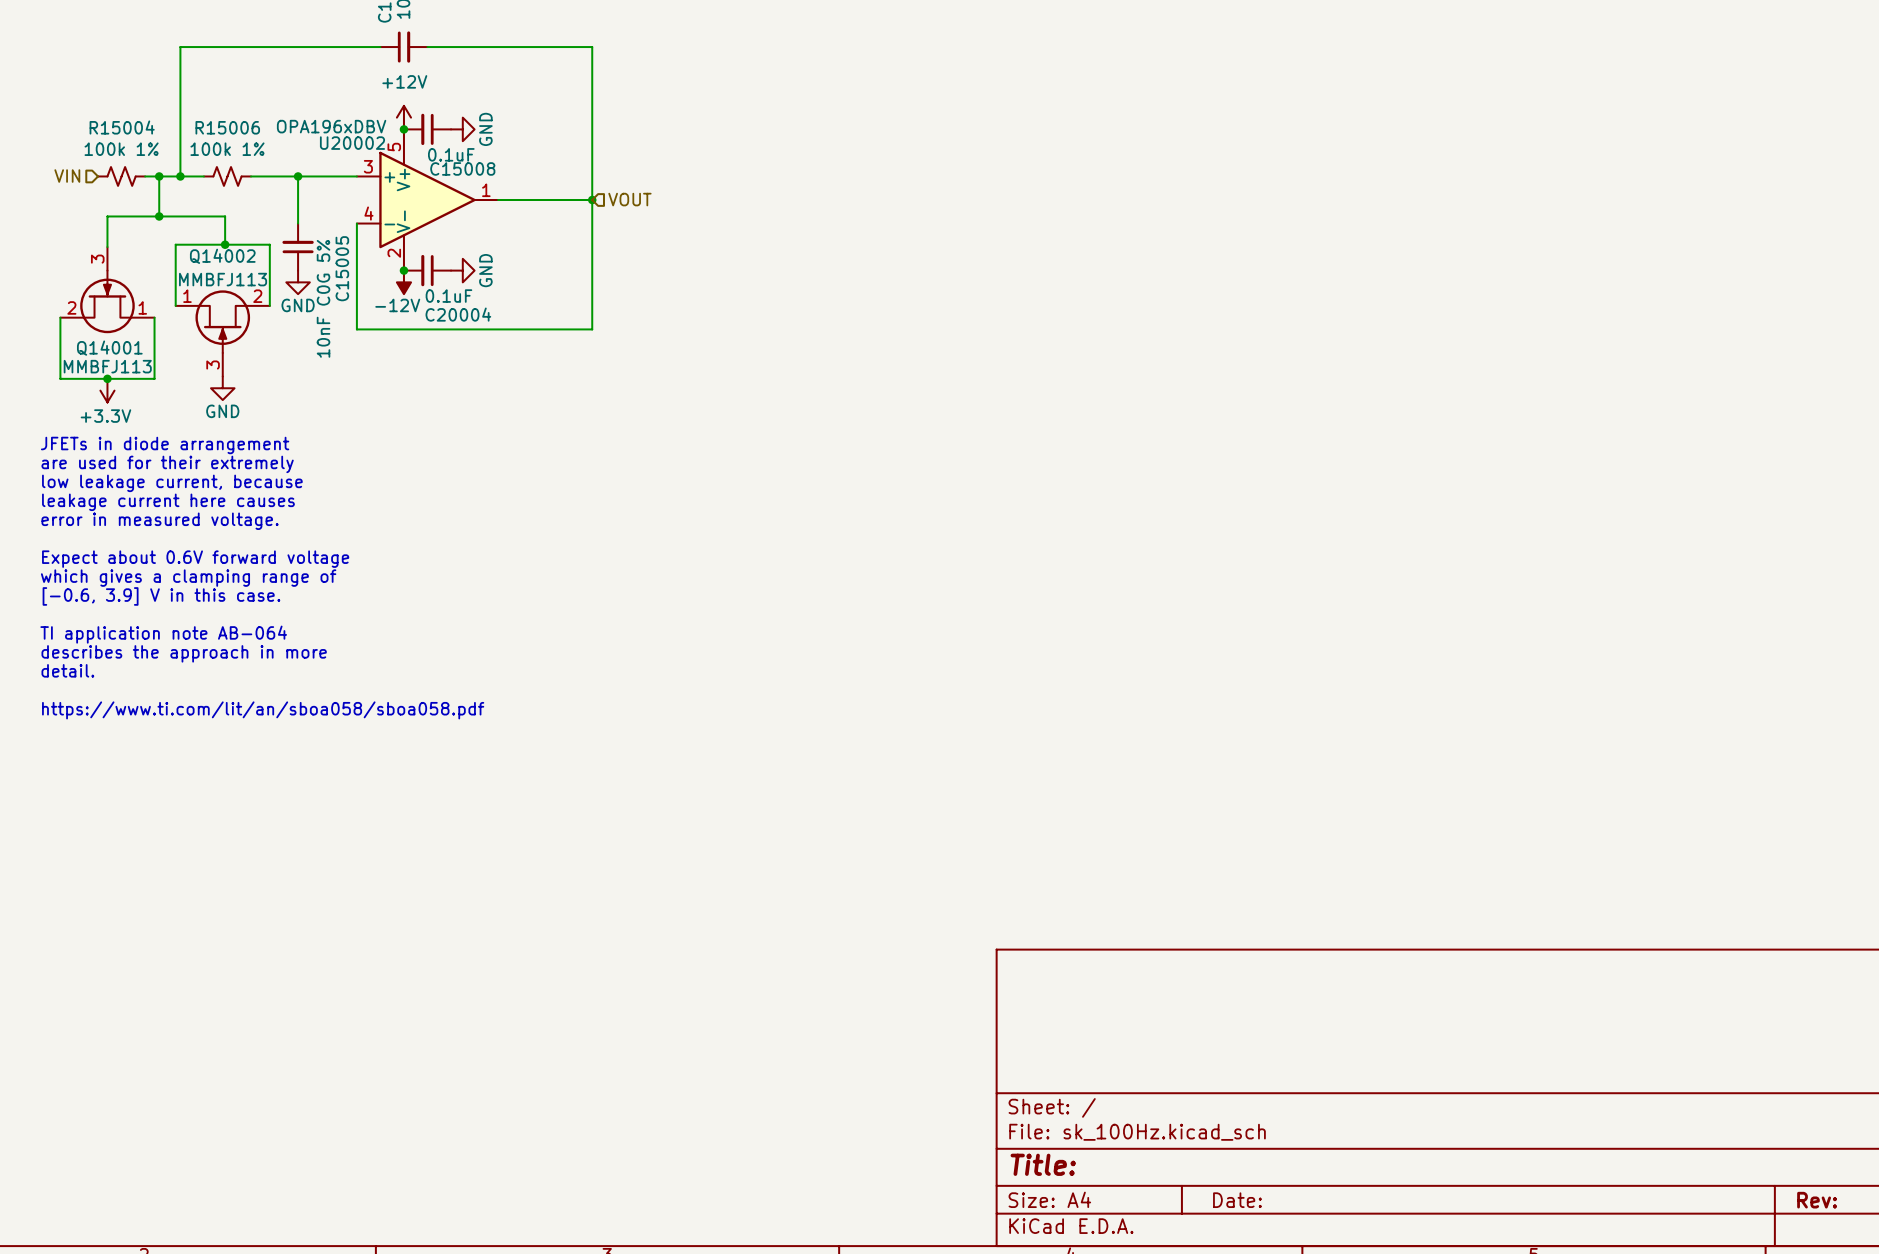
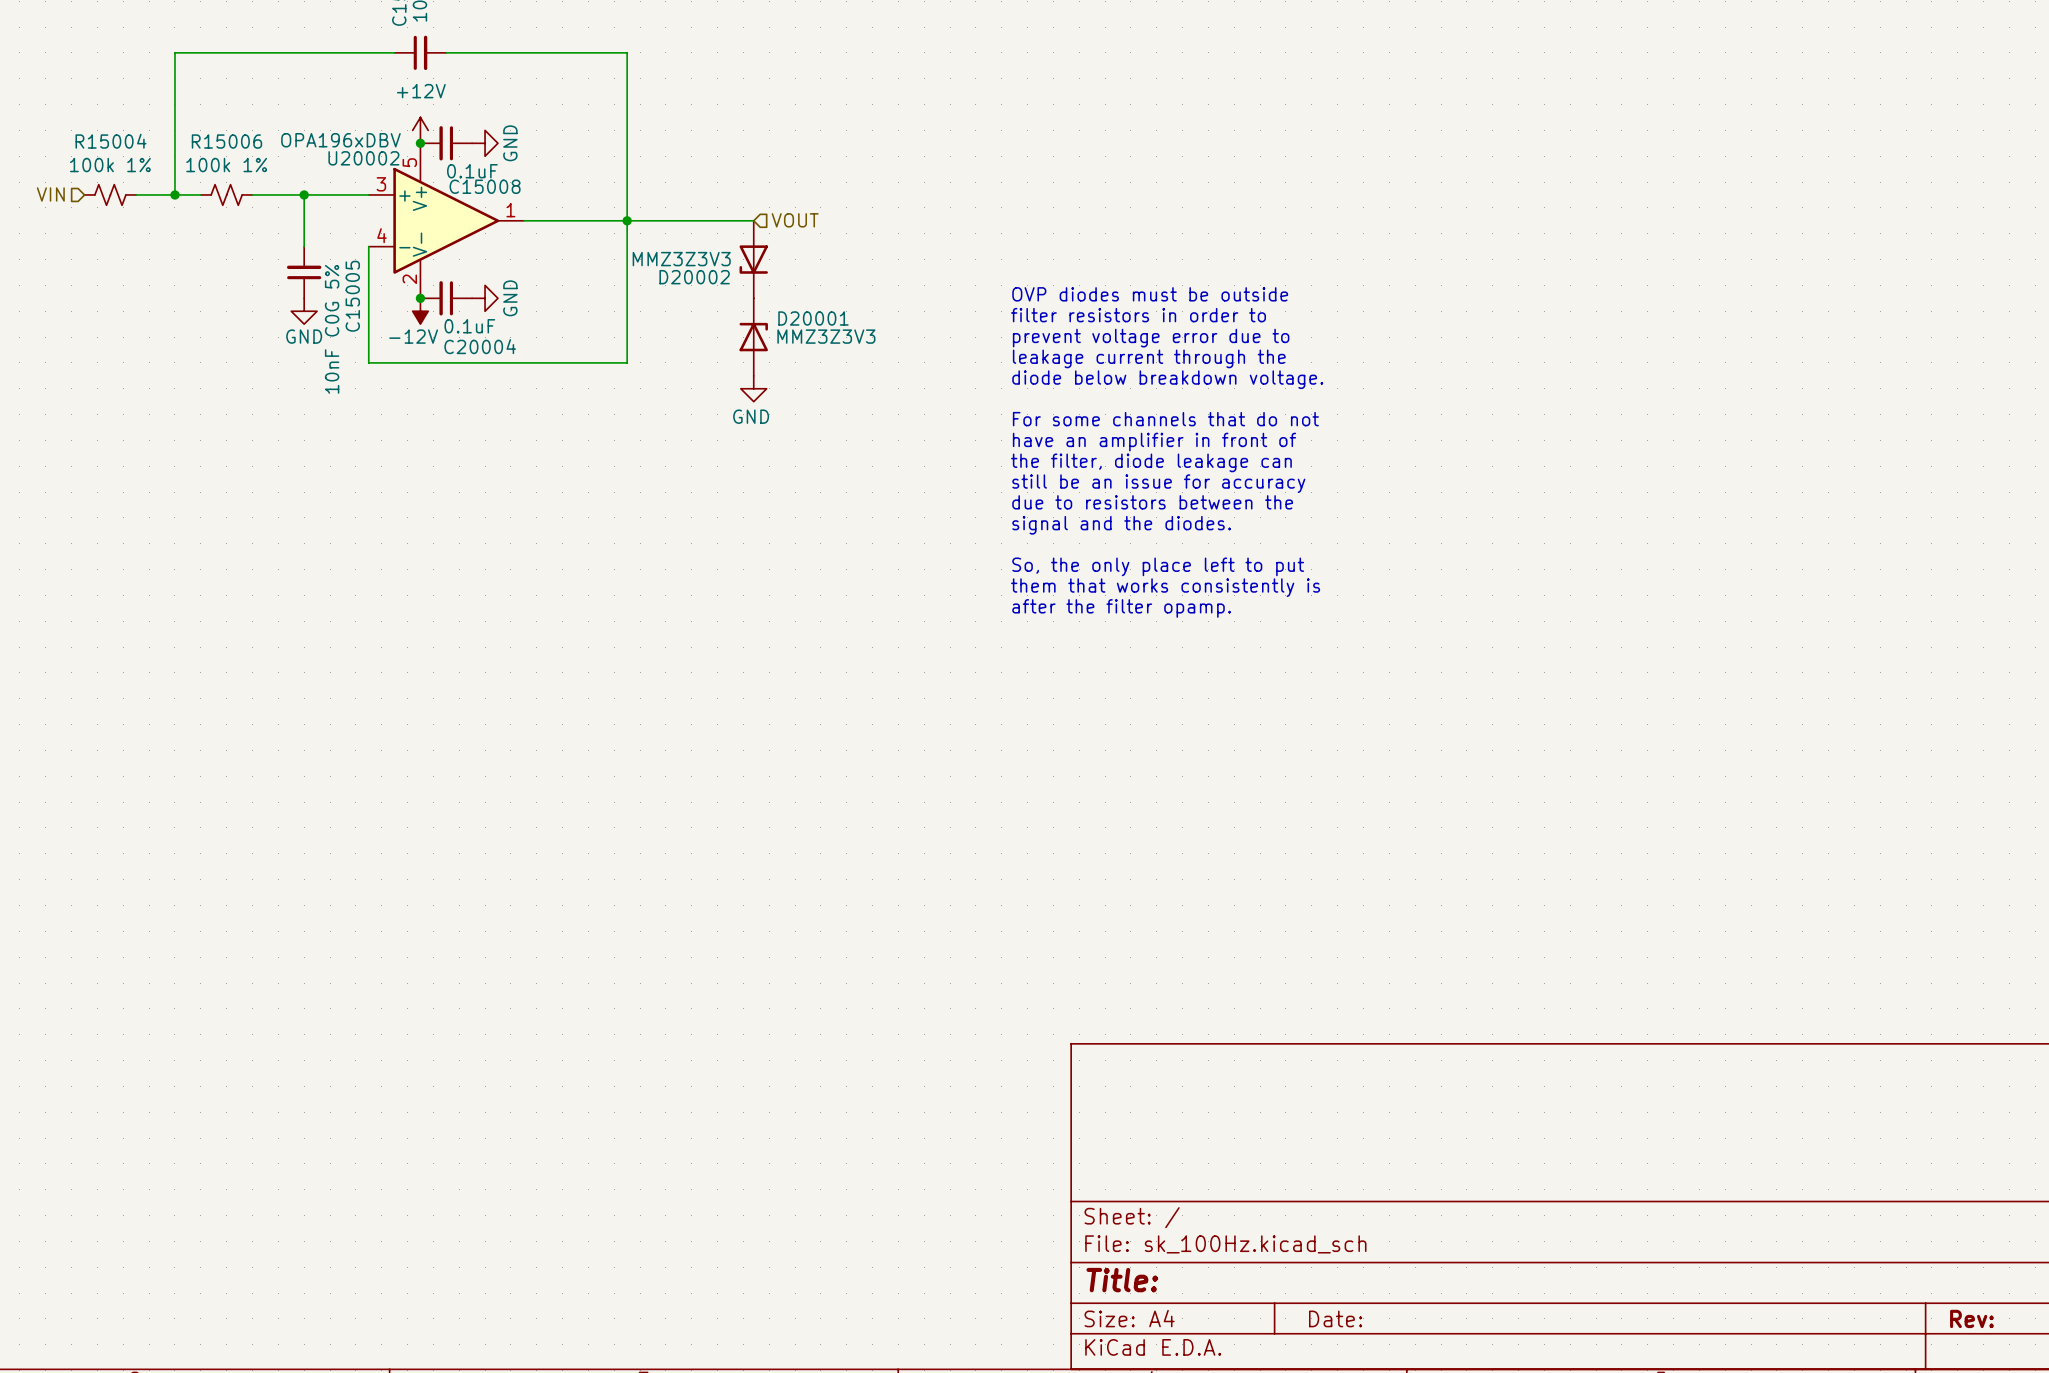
wire: (159, 176) (159, 216) -> none
junction: (159, 176) -> none
hierarchical label position: VOUT (629, 199) -> VOUT (795, 220)
wire: none -> (627, 220) (753, 220)
junction: (159, 216) -> none
D20002: none -> MMZ3Z3V3 (753, 259)
wire: (225, 244) (225, 216) (107, 216) (107, 247) -> none
junction: (225, 244) -> none
text: none -> OVP diodes must be outside (1150, 294)
text: none -> filter resistors in order to (1138, 315)
Q14001: MMBFJ113 (107, 290) -> none
wire: (175, 305) (175, 244) (269, 244) (269, 305) -> none
D20001: none -> MMZ3Z3V3 (753, 337)
text: none -> prevent voltage error due to (1151, 338)
wire: (60, 317) (60, 378) (154, 378) (154, 317) -> none
text: none -> leakage current through the (1149, 358)
Q14002: MMBFJ113 (222, 333) -> none
text: none -> diode below breakdown voltage. (1167, 379)
power symbol: none -> GND (753, 388)
junction: (107, 378) -> none
text: none -> For some channels that do not (1165, 419)
power symbol: GND (222, 388) -> none
power symbol: +3.3V (107, 390) -> none
text: none -> have an amplifier in front of (1154, 442)
text: none -> the filter, diode leakage can (1151, 462)
text: none -> still be an issue for accuracy (1158, 483)
text: JFETs in diode arrangement (165, 445) -> none
text: none -> due to resistors between the (1152, 502)
text: are used for their extremely (167, 464) -> none
text: none -> signal and the diodes. (1121, 525)
text: low leakage current, because (172, 483) -> none
text: leakage current here causes (168, 502) -> none
text: none -> So, the only place left to put (1158, 566)
text: error in measured voltage. (160, 521) -> none
text: none -> them that works consistently is (1165, 587)
text: none -> after the filter opamp. (1121, 608)
text: Expect about 0.6V forward voltage (195, 559) -> none
text: which gives a clamping range of (188, 578) -> none
text: [-0.6, 3.9] V in this case. (161, 596) -> none
text: TI application note AB-064 (163, 634) -> none
text: describes the approach in more (184, 653) -> none
text: detail. (67, 670) -> none
text: https://www.ti.com/lit/an/sboa058/sboa058.pdf (263, 710) -> none

